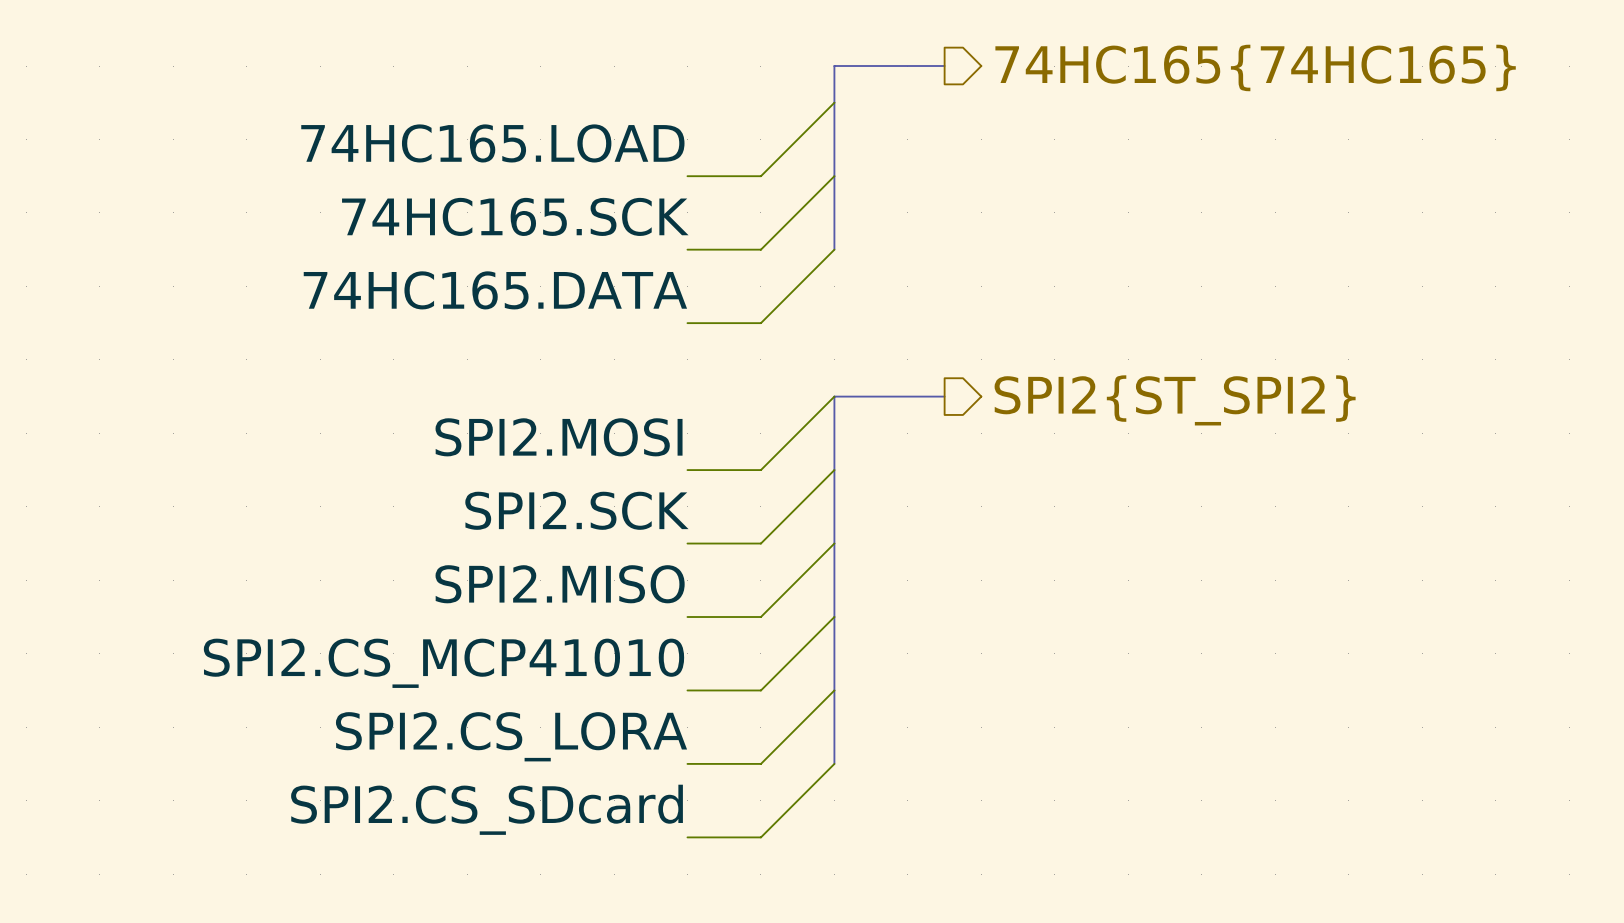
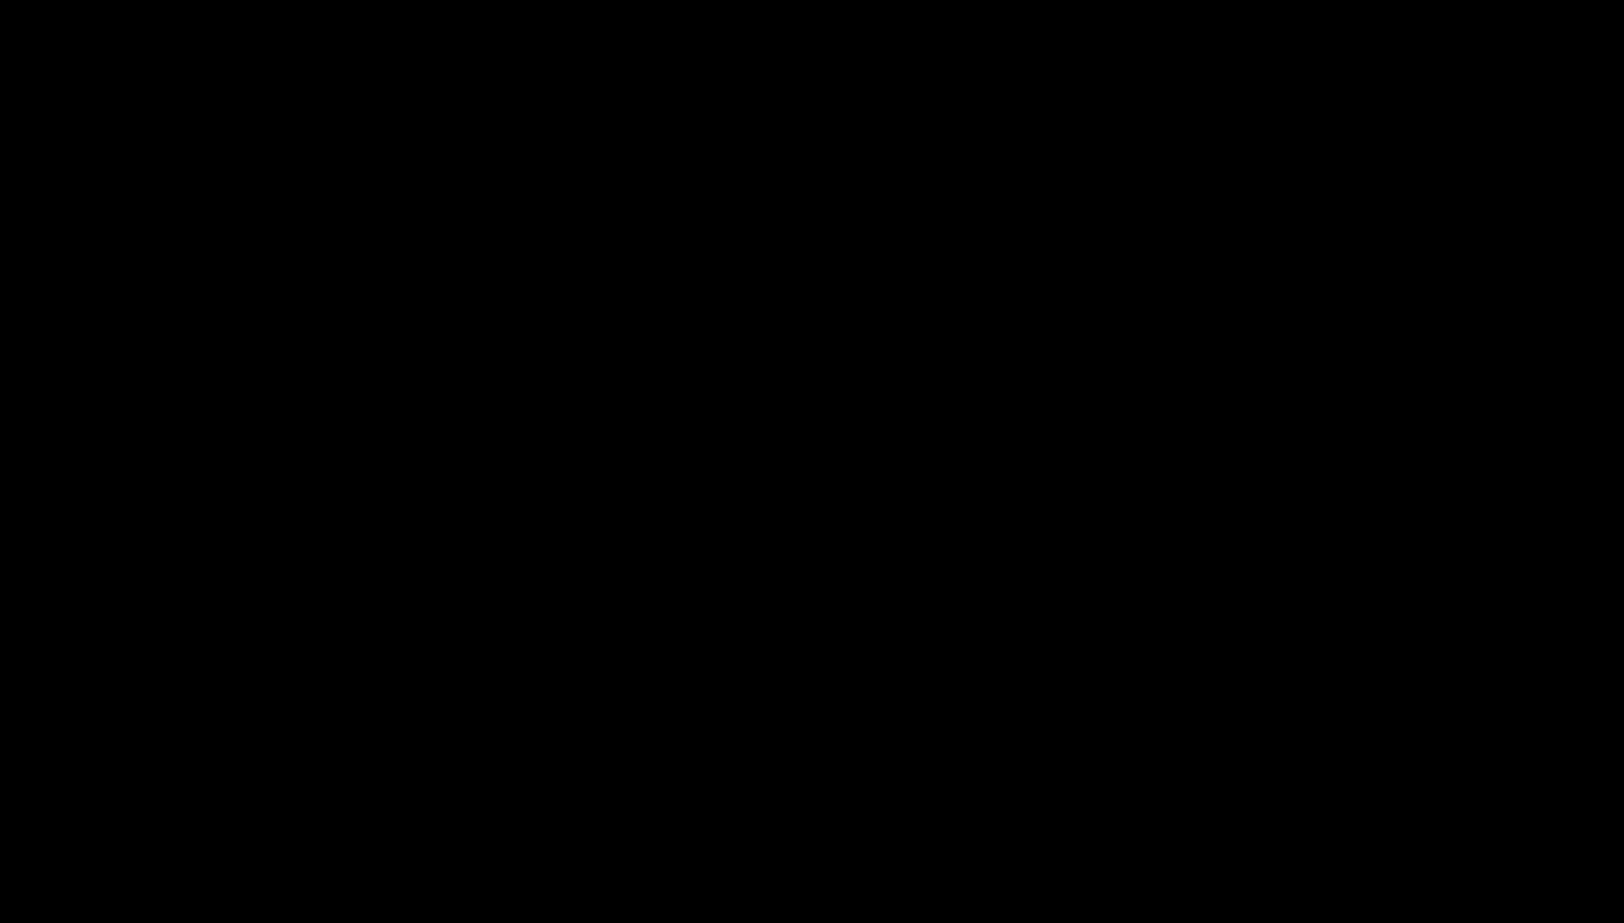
bus: (944, 66) (834, 66) (834, 249) -> none
hierarchical label: 74HC165{74HC165} (1255, 67) -> none
wire: (834, 102) (760, 176) (687, 176) -> none
label: 74HC165.LOAD (492, 143) -> none
wire: (834, 176) (760, 249) (687, 249) -> none
label: 74HC165.SCK (515, 216) -> none
wire: (834, 249) (760, 323) (687, 323) -> none
label: 74HC165.DATA (495, 290) -> none
wire: (834, 396) (760, 470) (687, 470) -> none
bus: (944, 396) (834, 396) (834, 763) -> none
hierarchical label: SPI2{ST_SPI2} (1175, 400) -> none
label: SPI2.MOSI (559, 437) -> none
wire: (834, 470) (760, 543) (687, 543) -> none
label: SPI2.SCK (576, 510) -> none
wire: (834, 543) (760, 617) (687, 617) -> none
label: SPI2.MISO (560, 584) -> none
wire: (834, 617) (760, 690) (687, 690) -> none
label: SPI2.CS_MCP41010 (443, 663) -> none
wire: (834, 690) (760, 763) (687, 763) -> none
label: SPI2.CS_LORA (511, 736) -> none
wire: (834, 763) (760, 837) (687, 837) -> none
label: SPI2.CS_SDcard (487, 809) -> none

